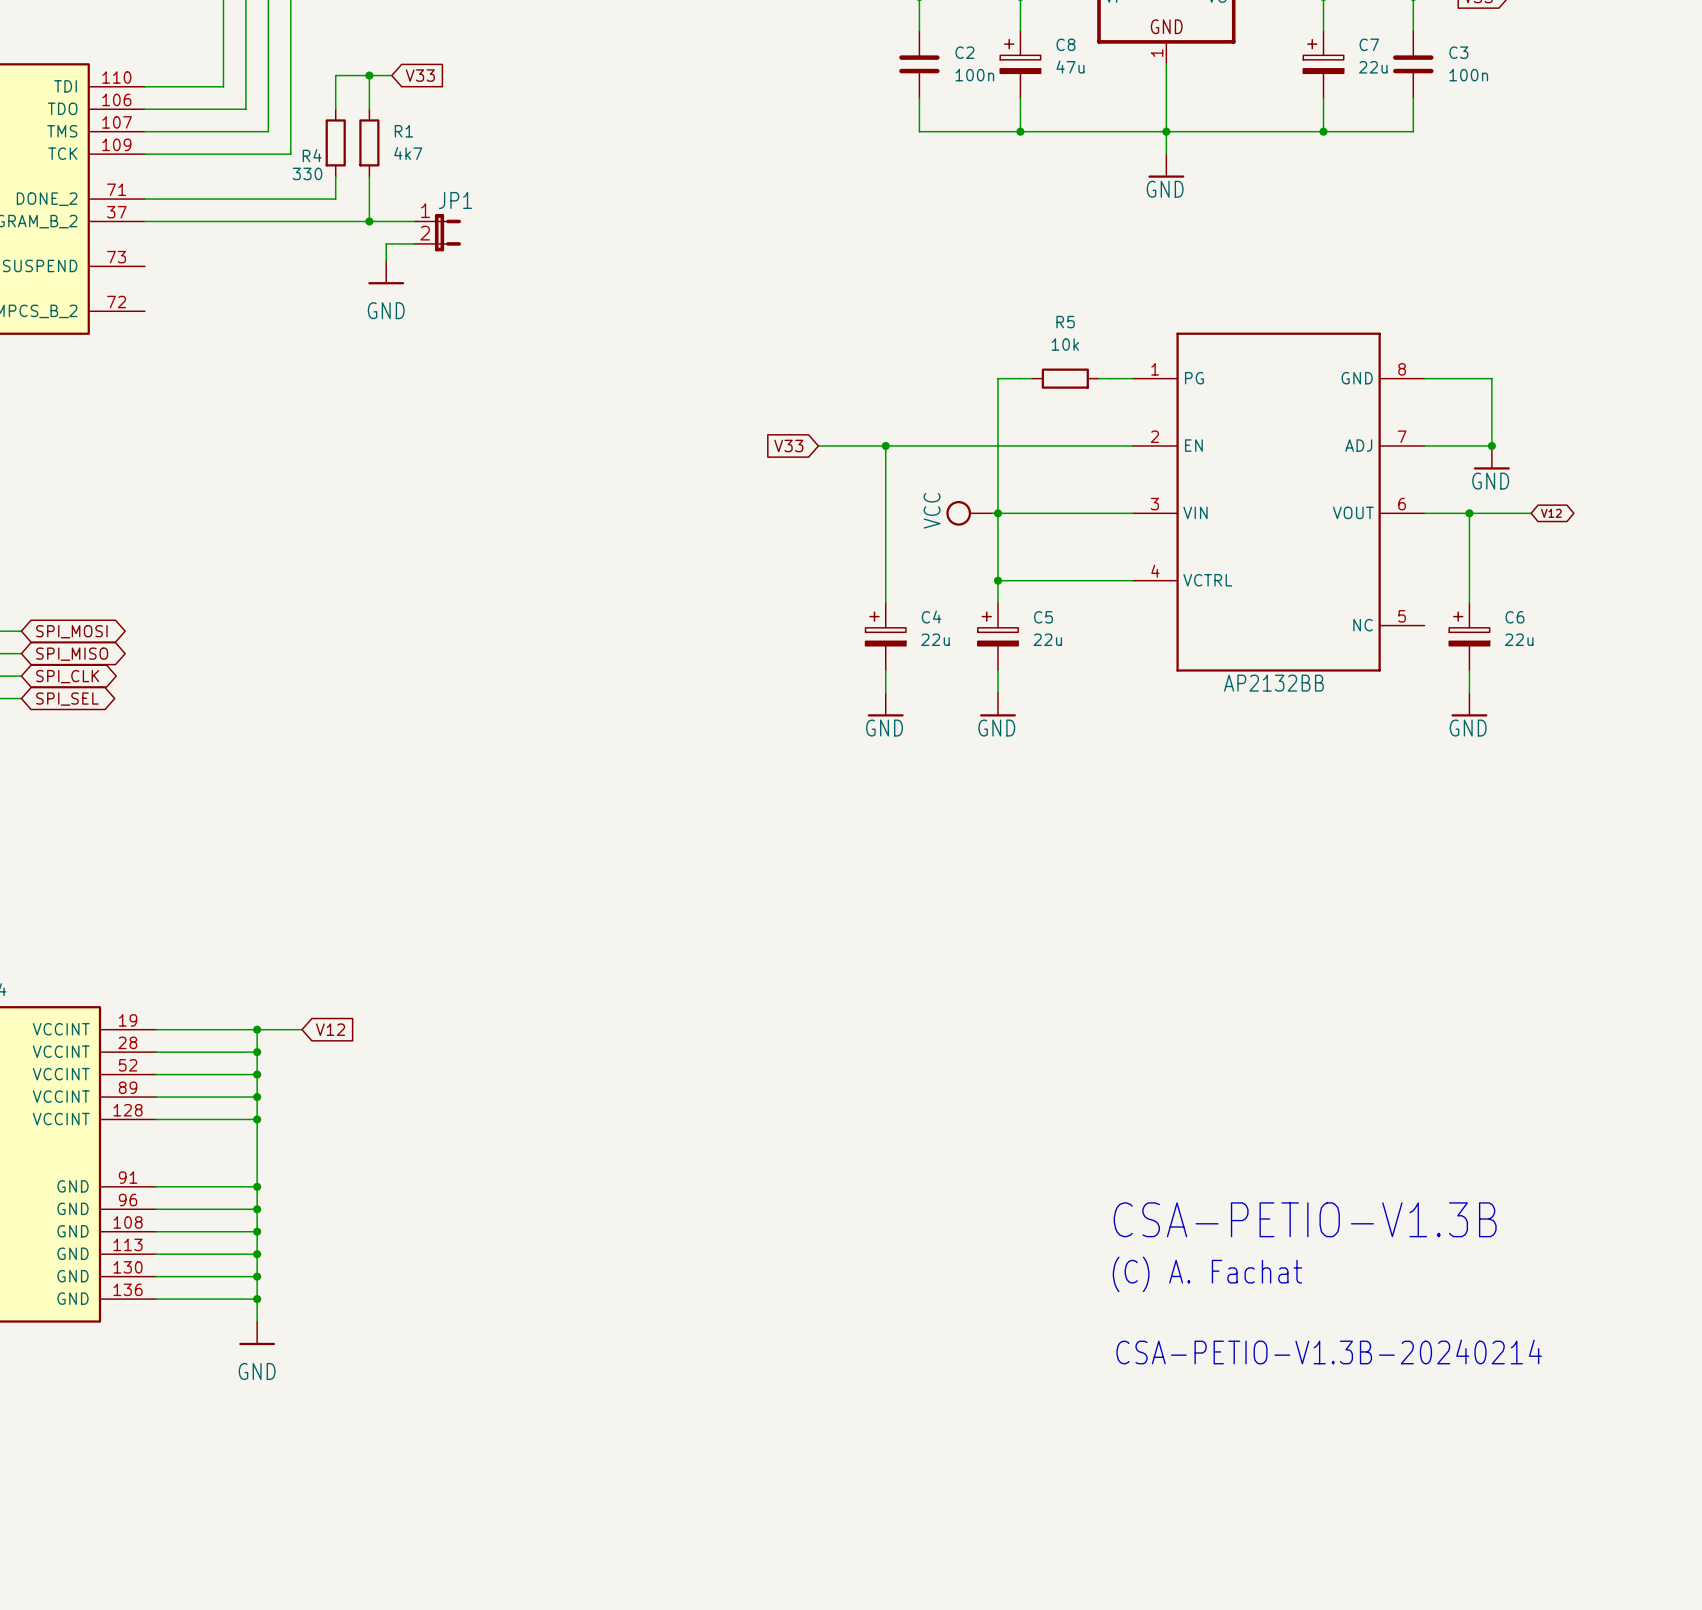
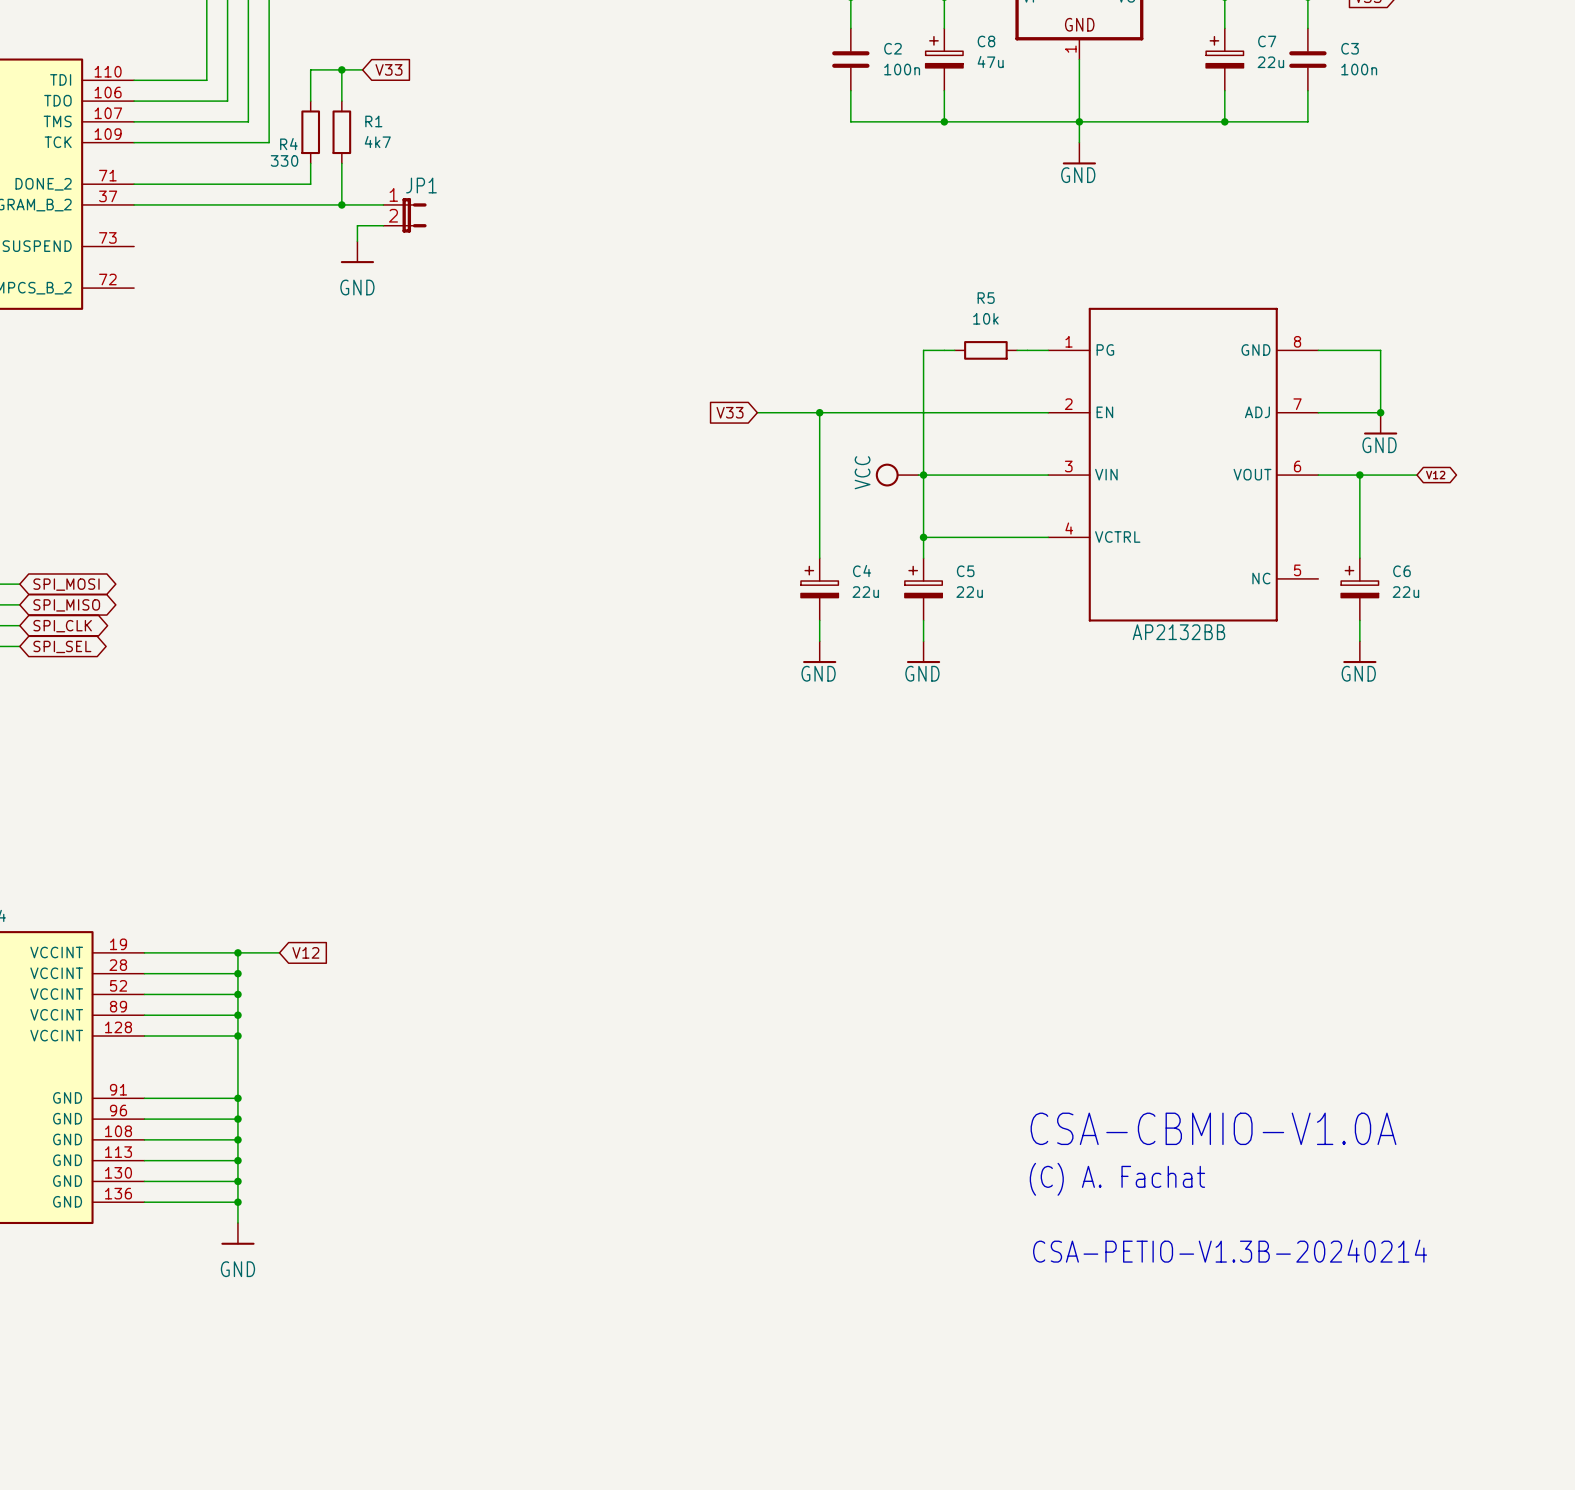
text: CSA-PETIO-V1.3B (1305, 1219) -> CSA-CBMIO-V1.0A (1213, 1128)

